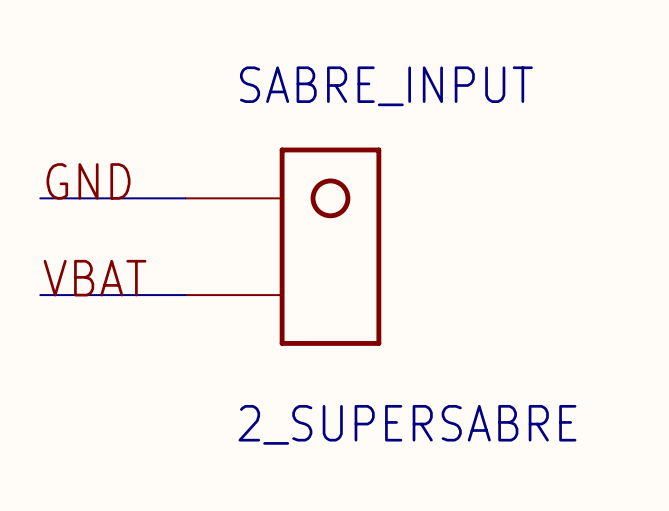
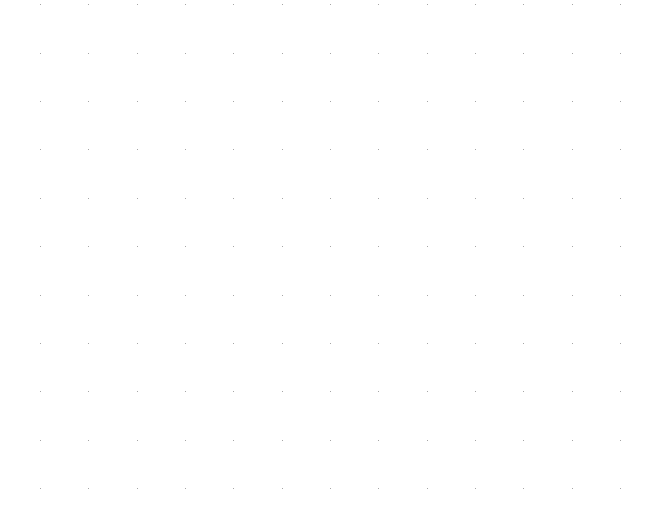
label: GND (88, 181) -> none
wire: (40, 198) (185, 198) -> none
SABRE_INPUT: 2_SUPERSABRE (283, 246) -> none
label: VBAT (95, 278) -> none
wire: (40, 295) (185, 295) -> none

